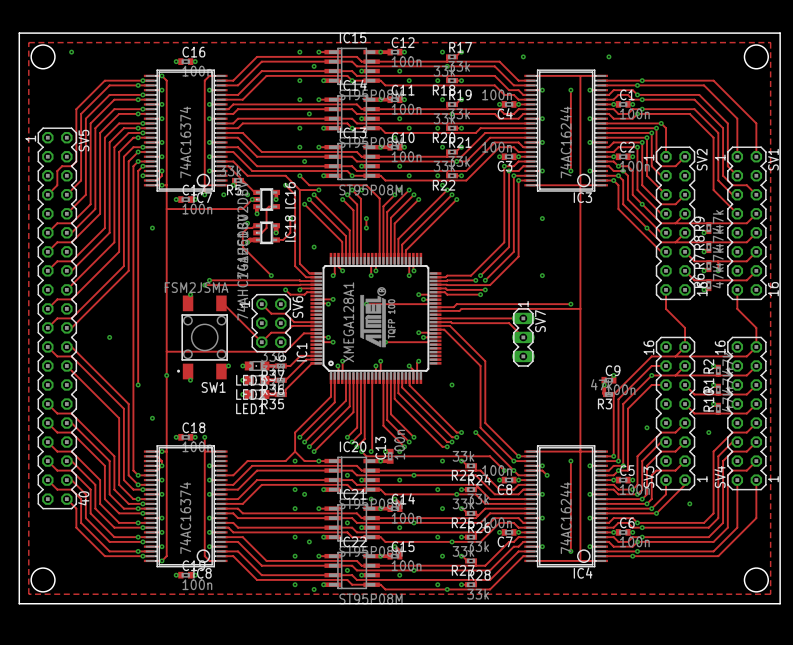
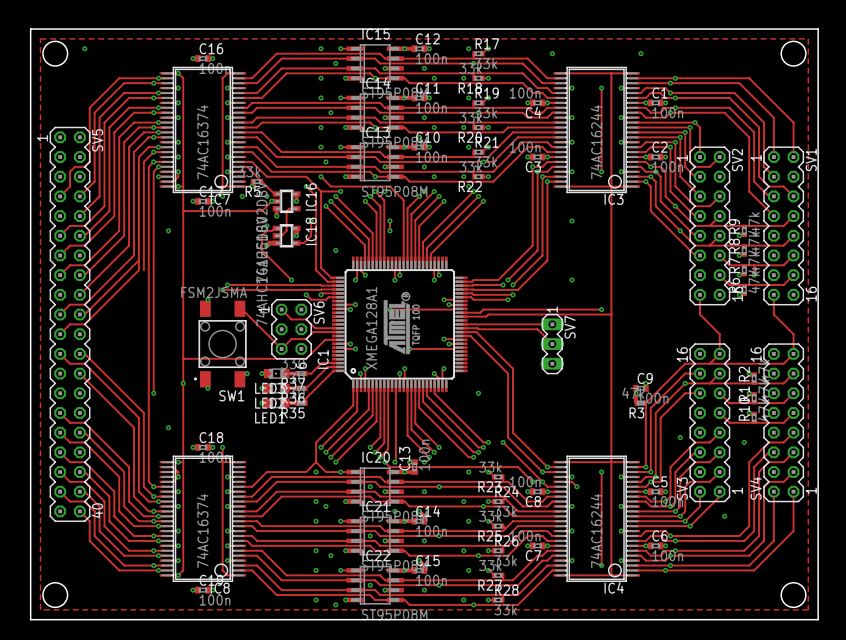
track: none -> (138, 260) (84, 314) (79, 314)
track: (128, 266) (128, 270) (71, 327) (66, 327) -> none
via: (109, 337) -> none

